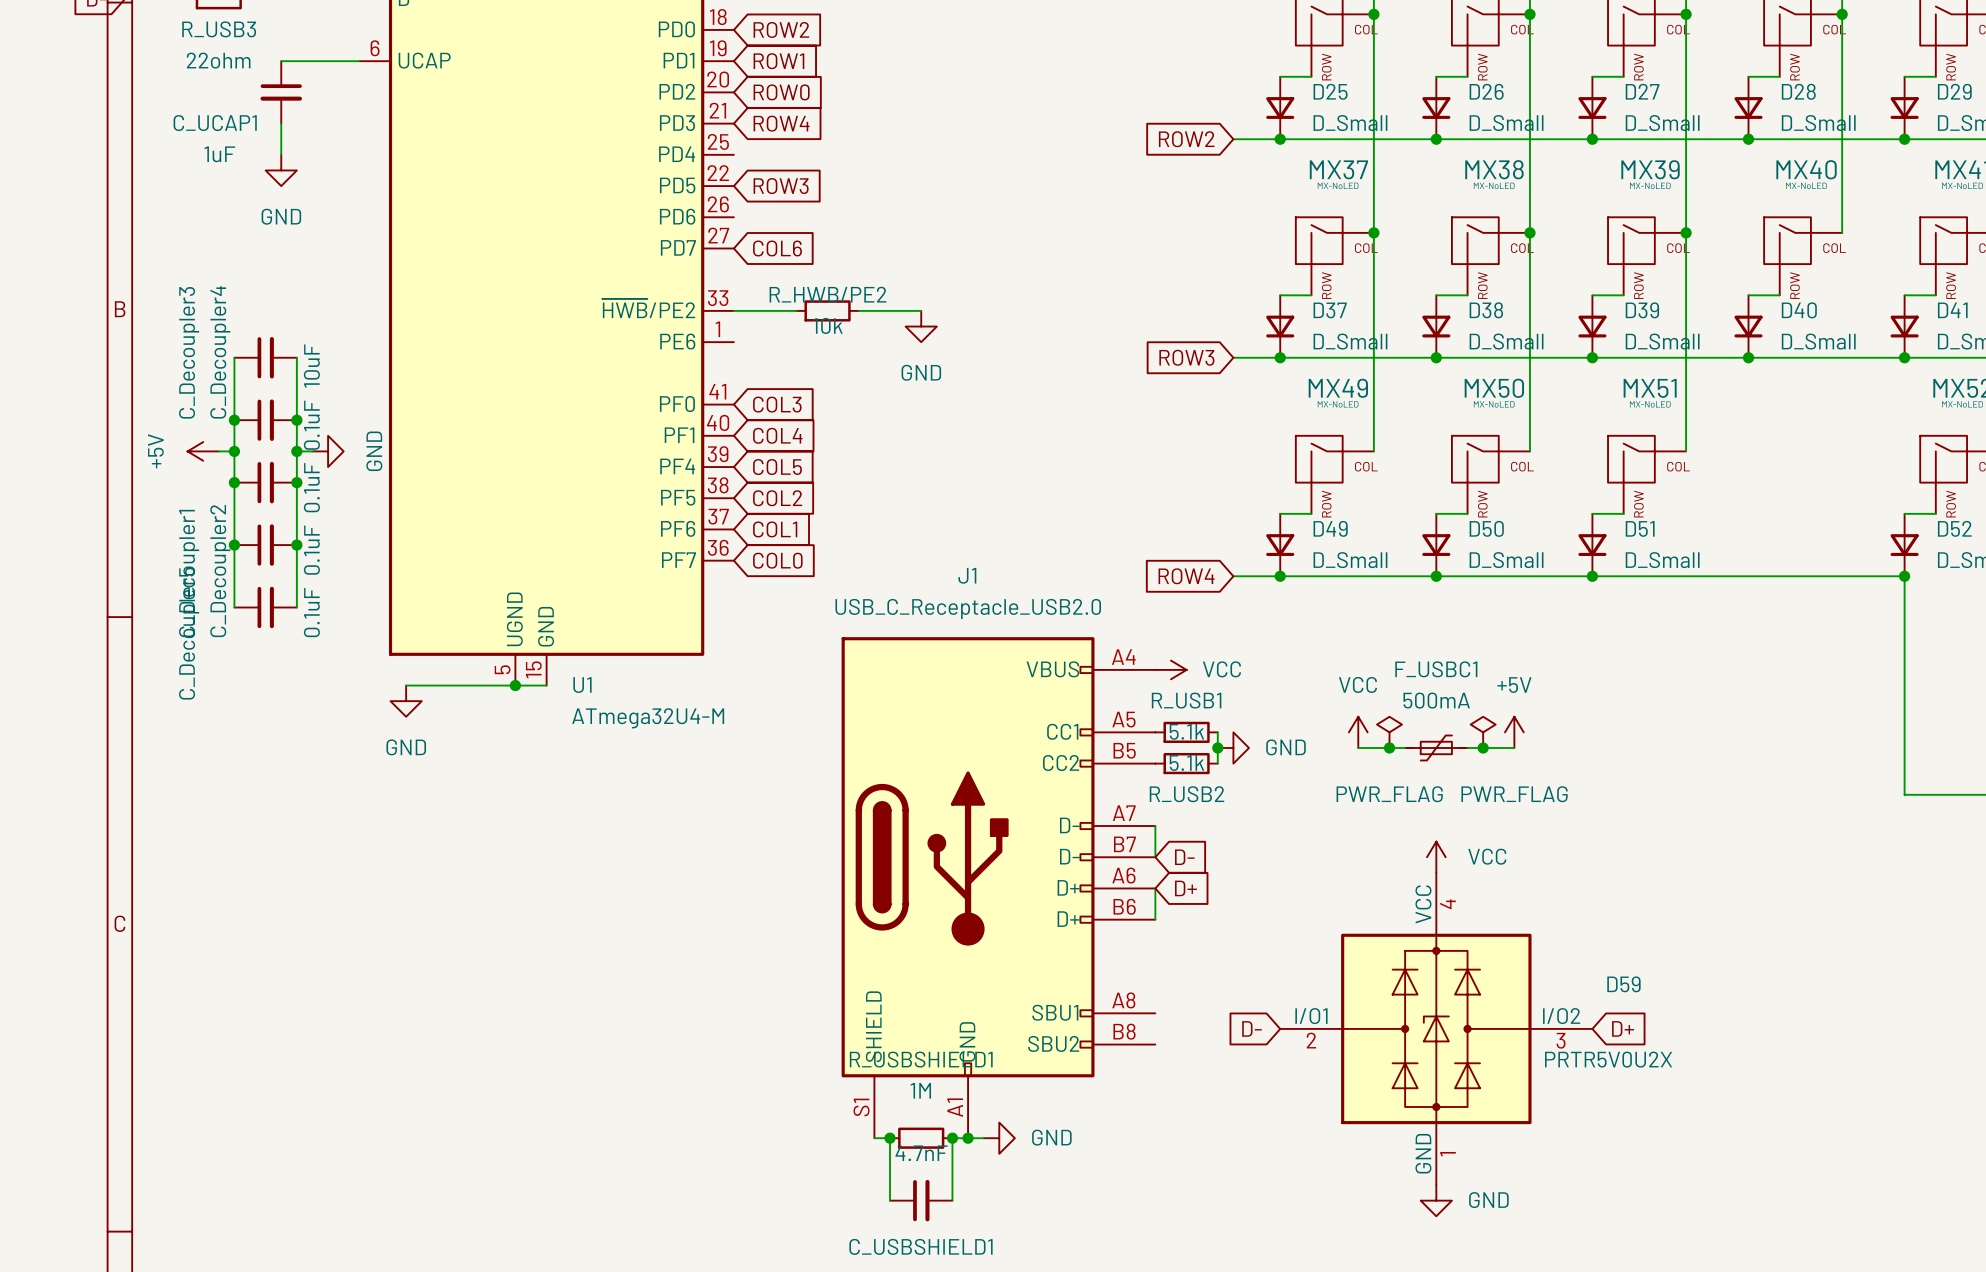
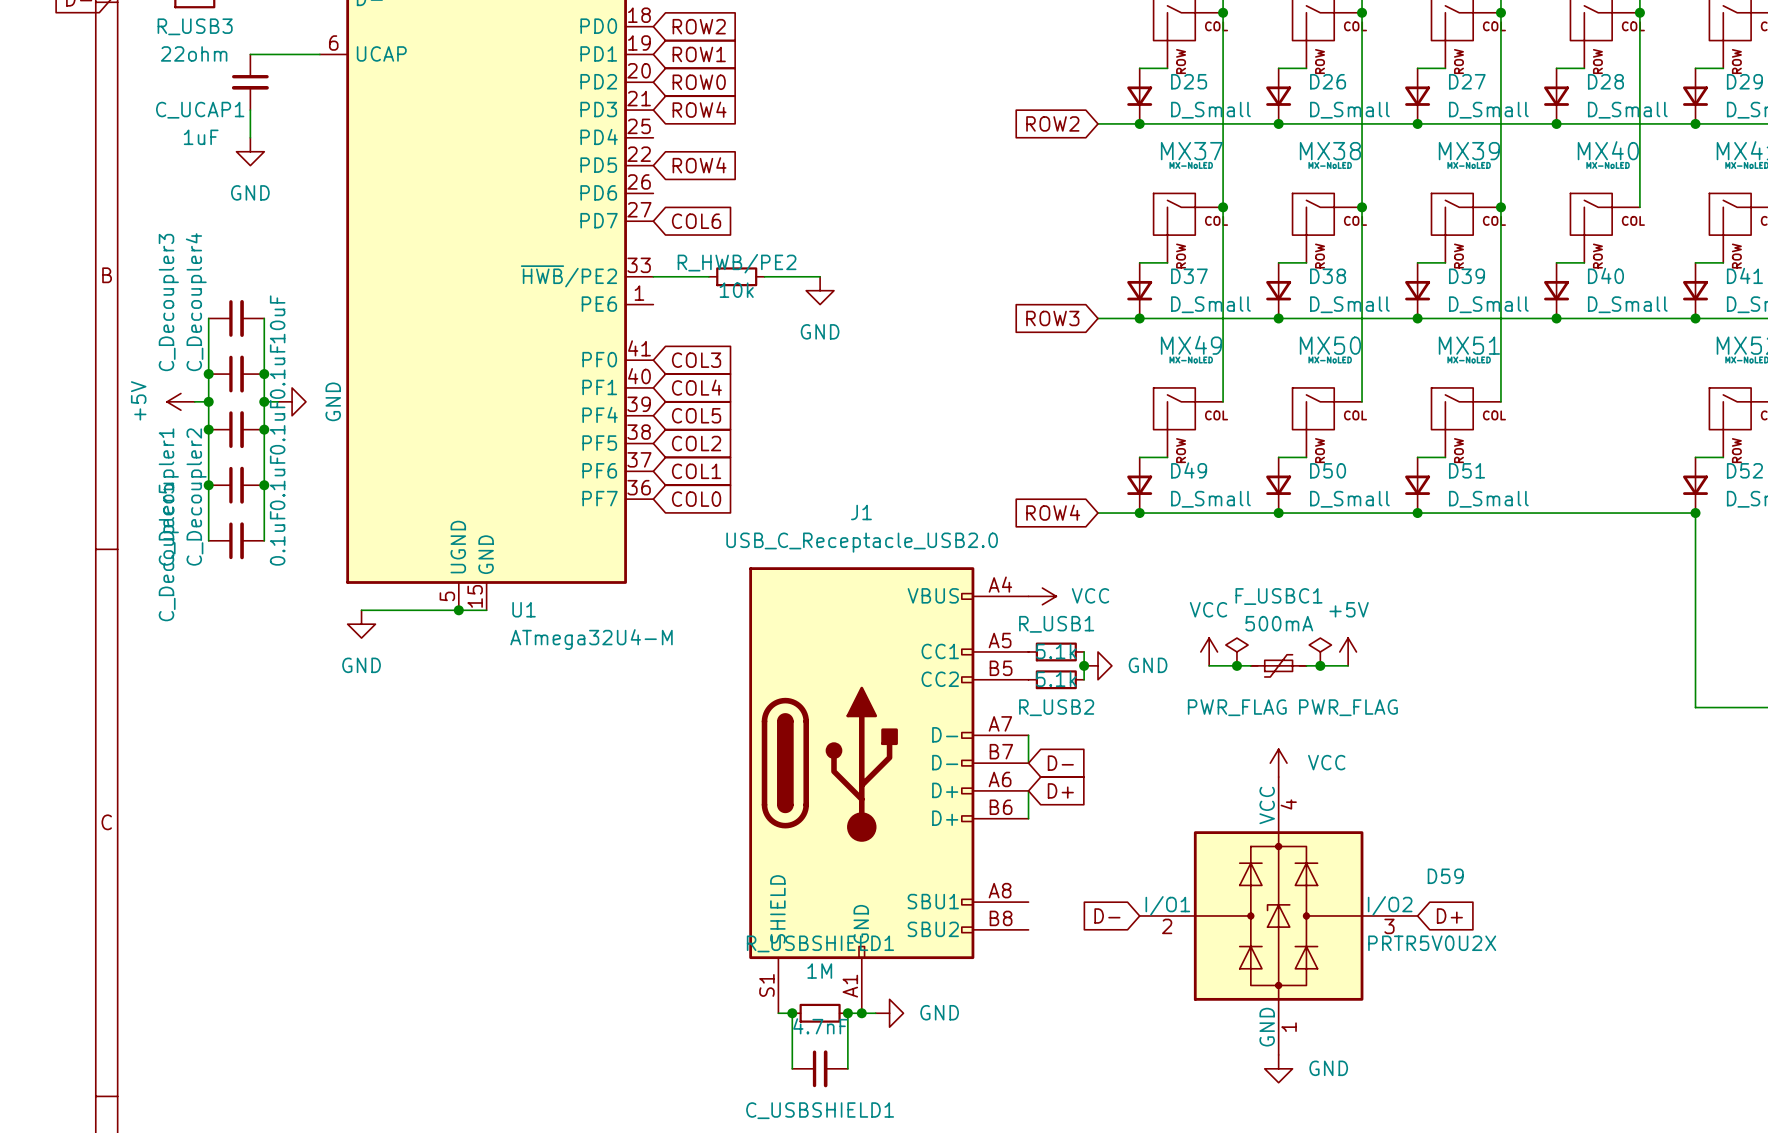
global label: ROW3 (781, 186) -> ROW4 (699, 165)

